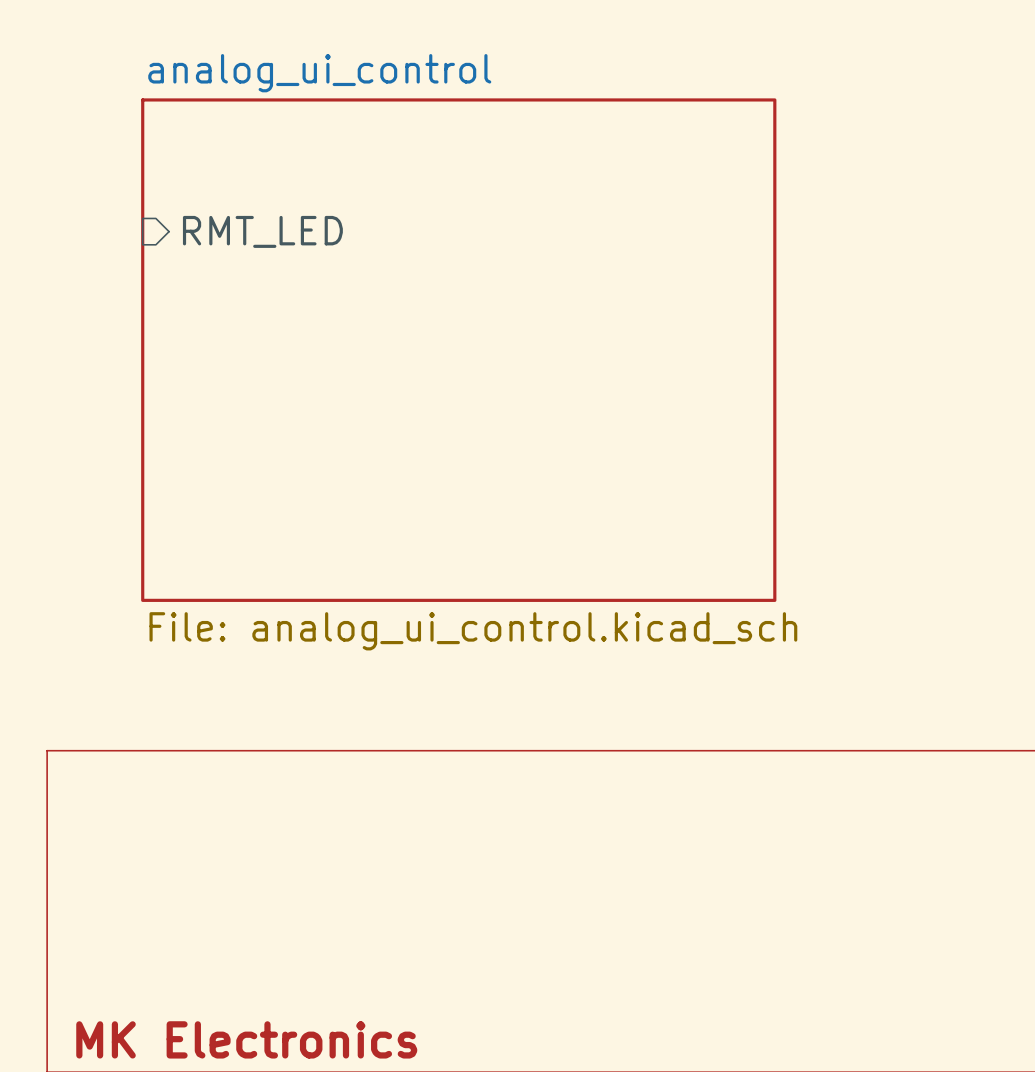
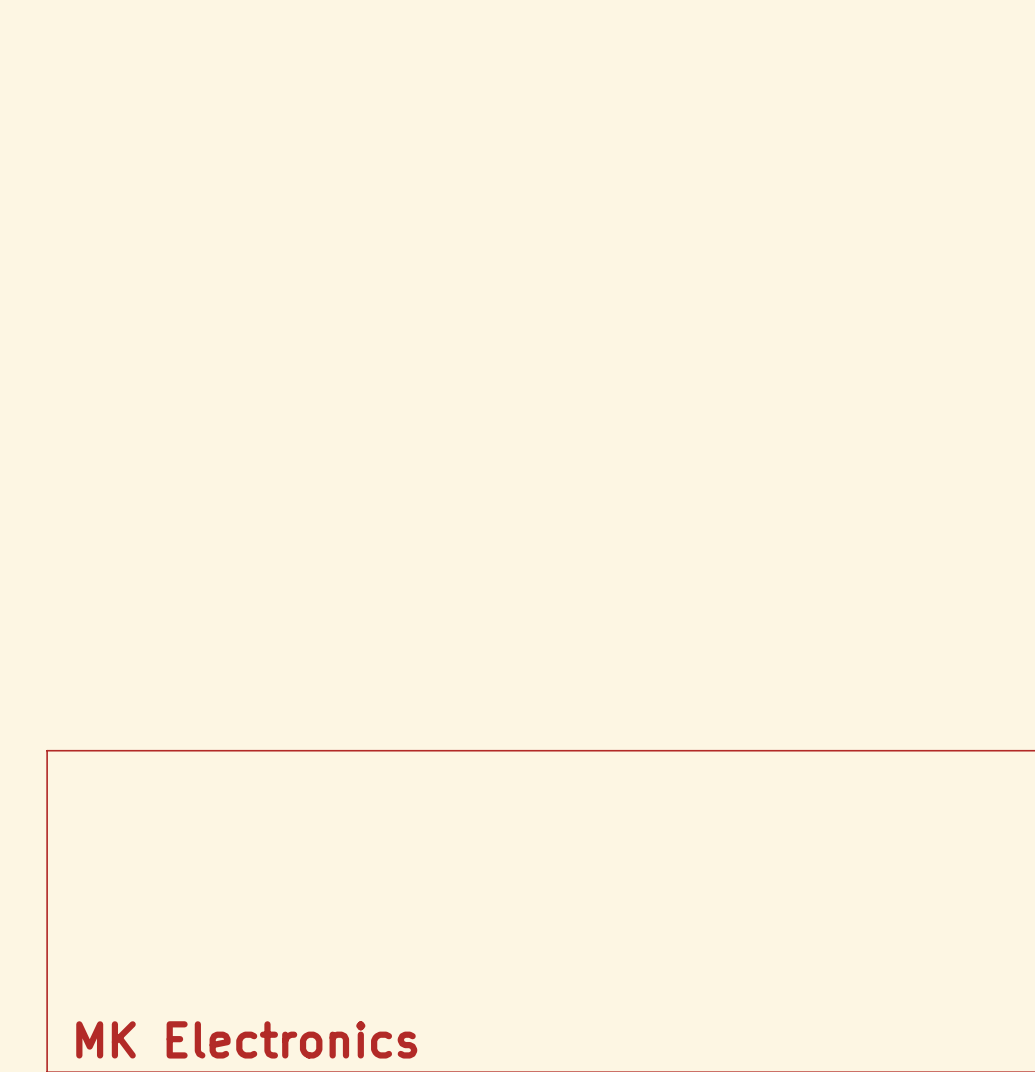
sheet pin: RMT_LED (262, 231) -> none
sheet analog_ui_control: File: analog_ui_control.kicad_sch (458, 350) -> none

